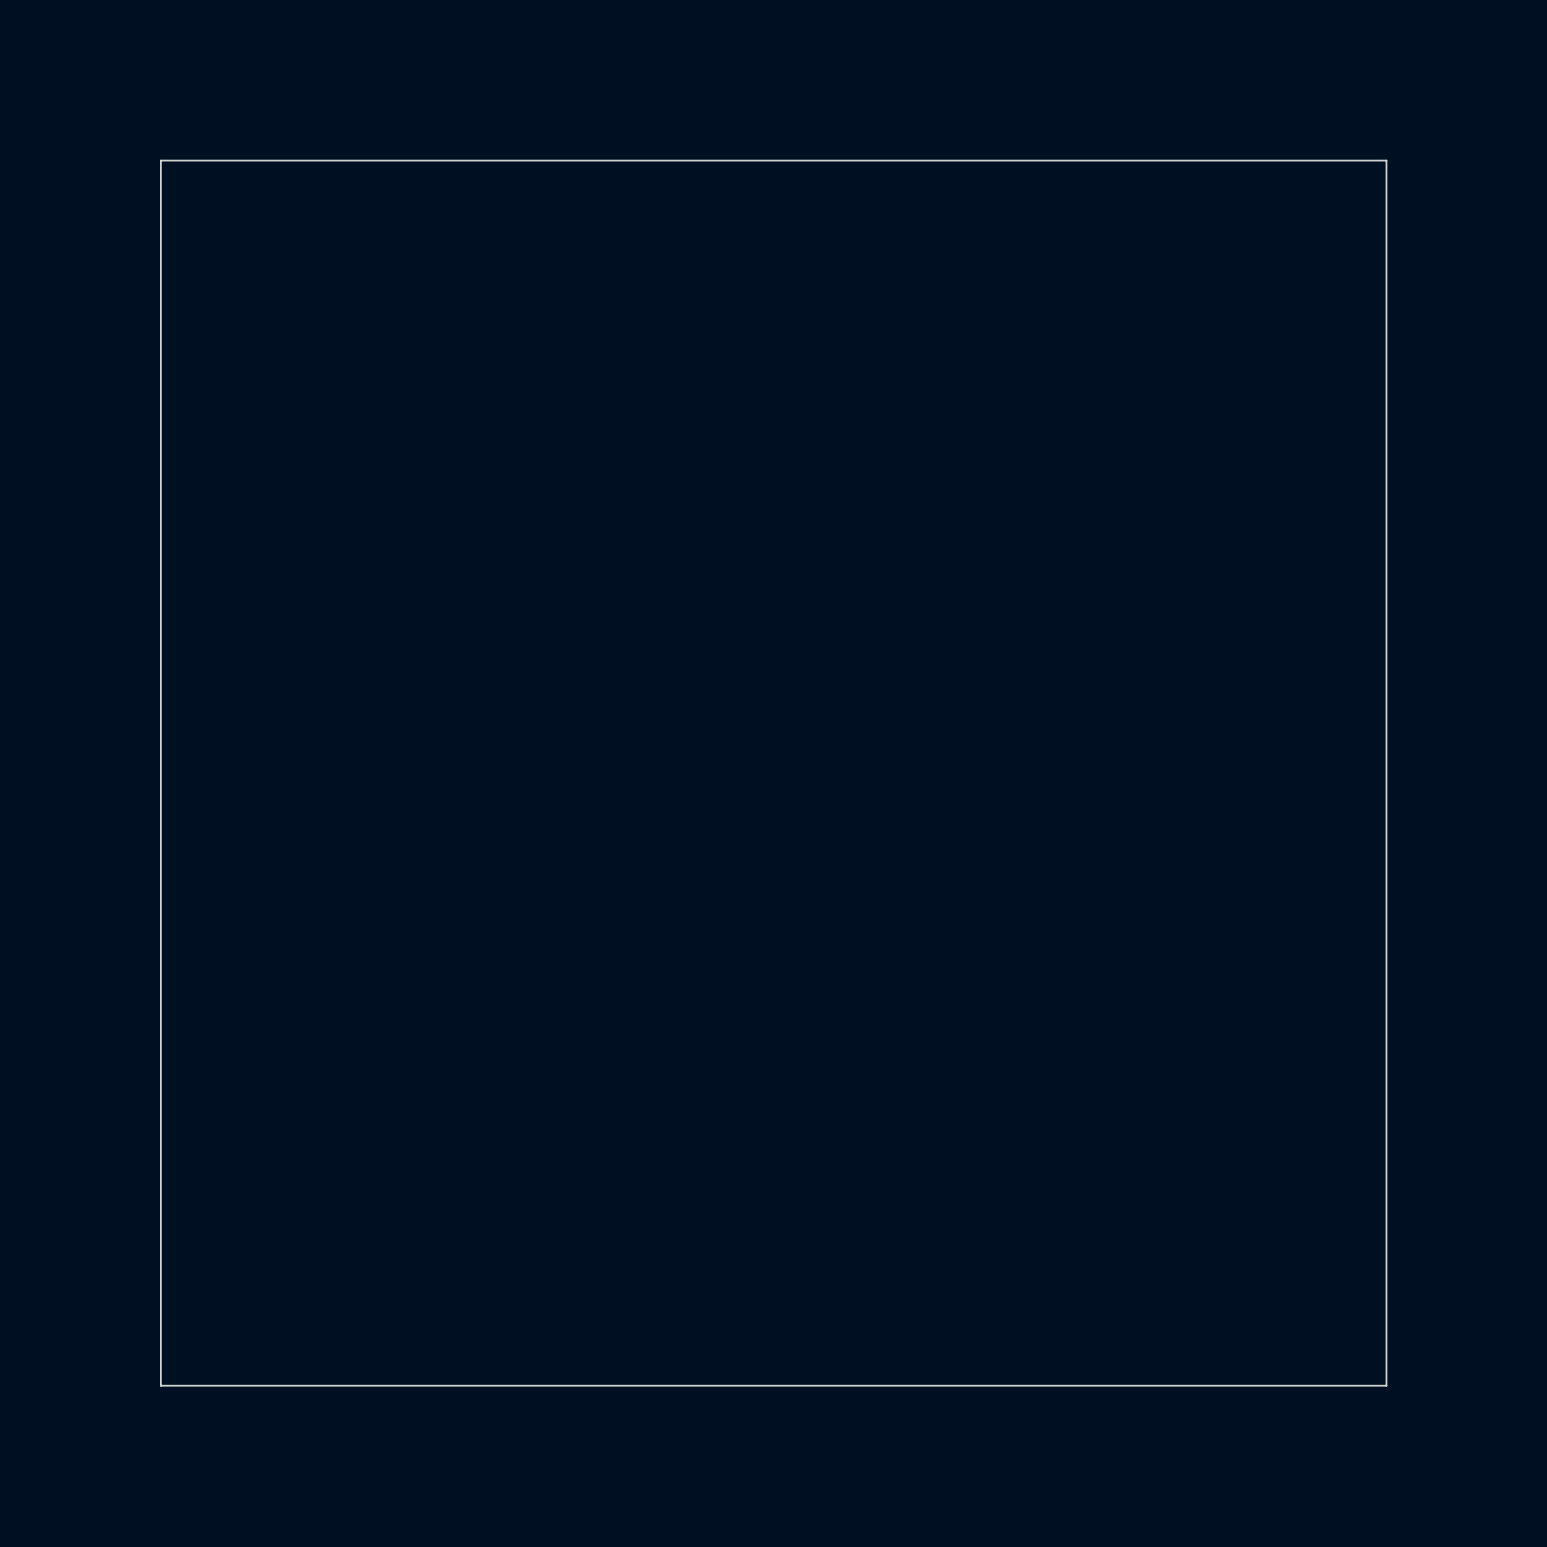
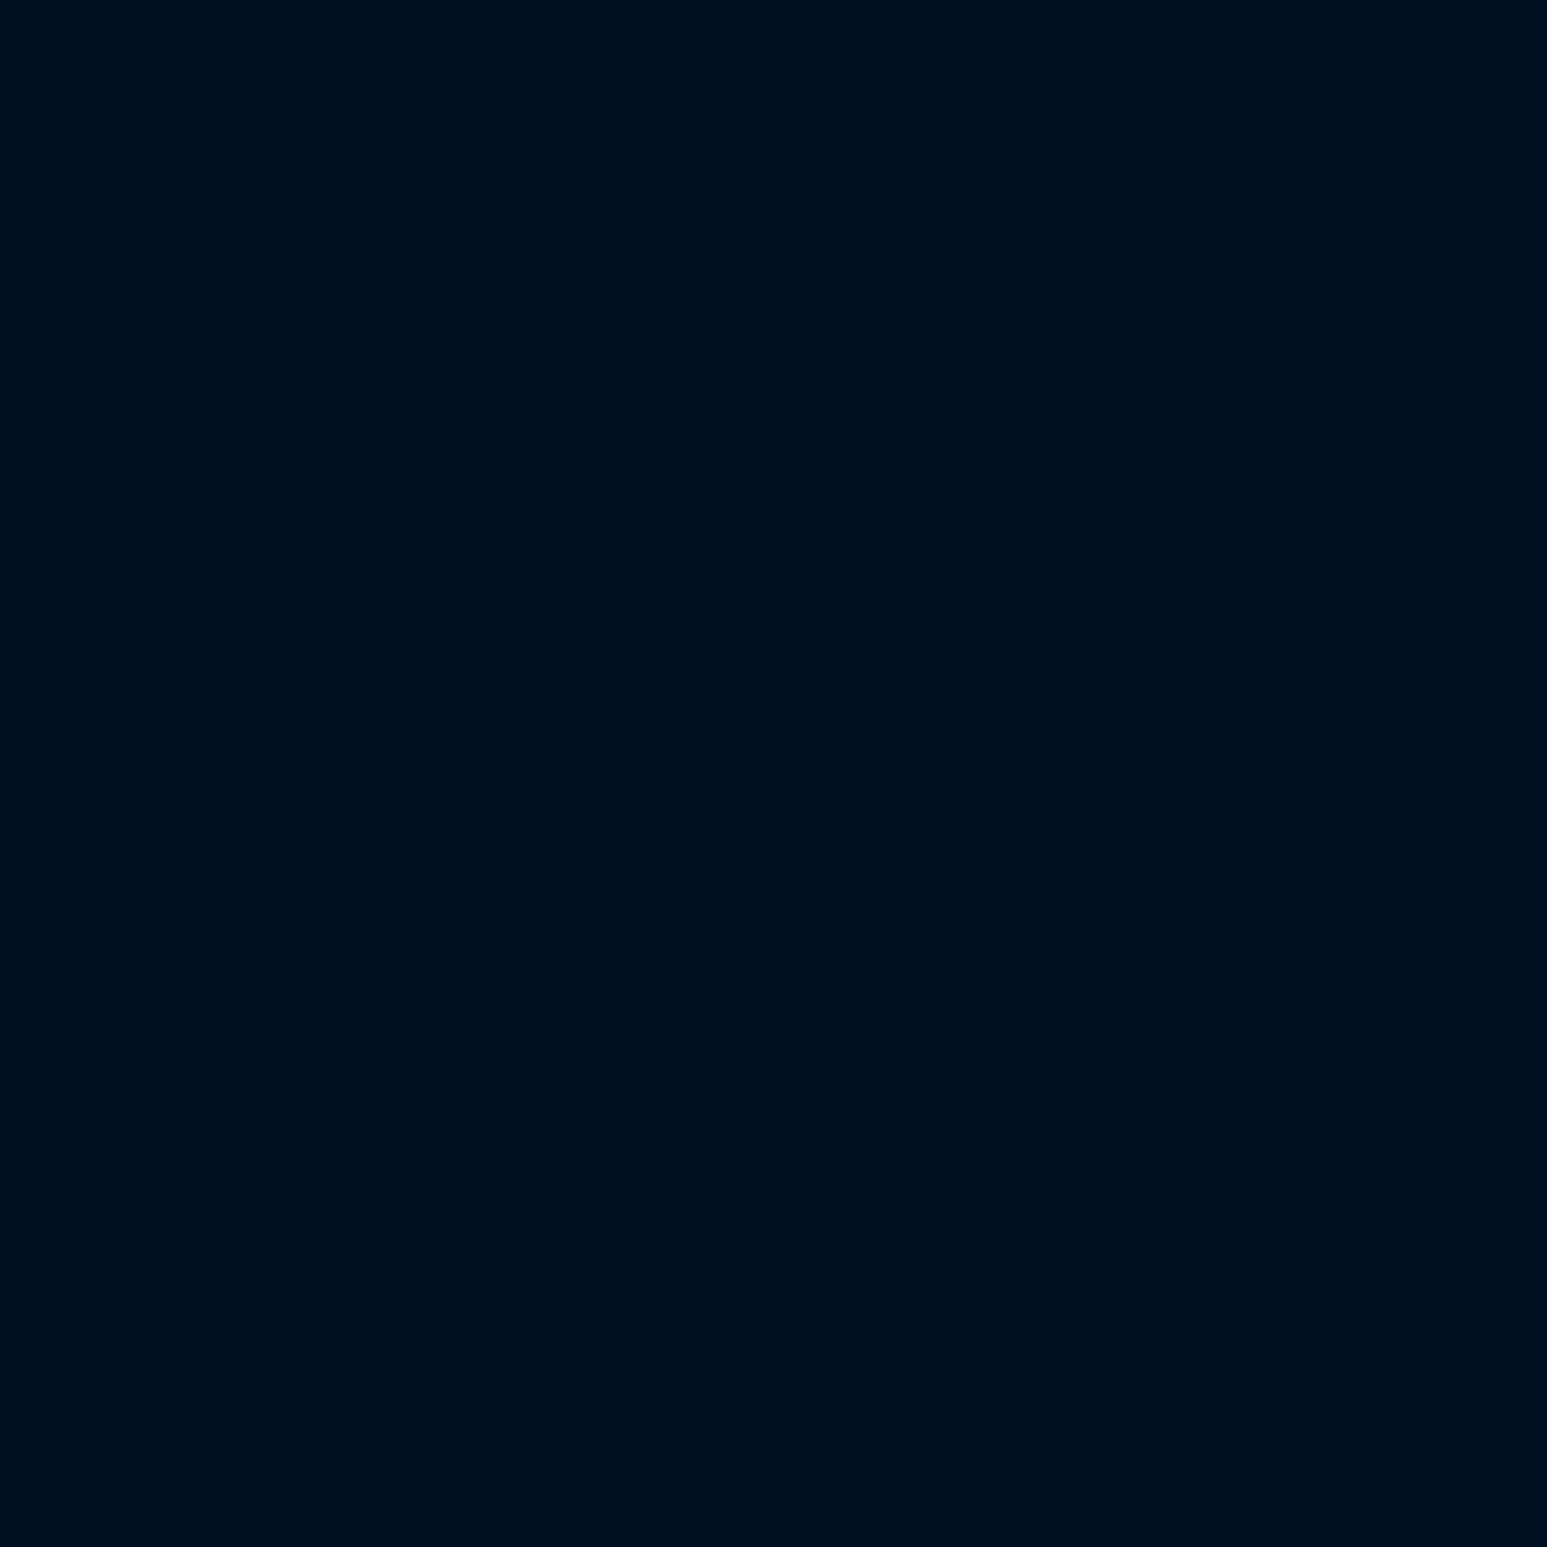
board edge: (1386, 160) (160, 160) (160, 1385) (1386, 1385) (1386, 160) -> none

